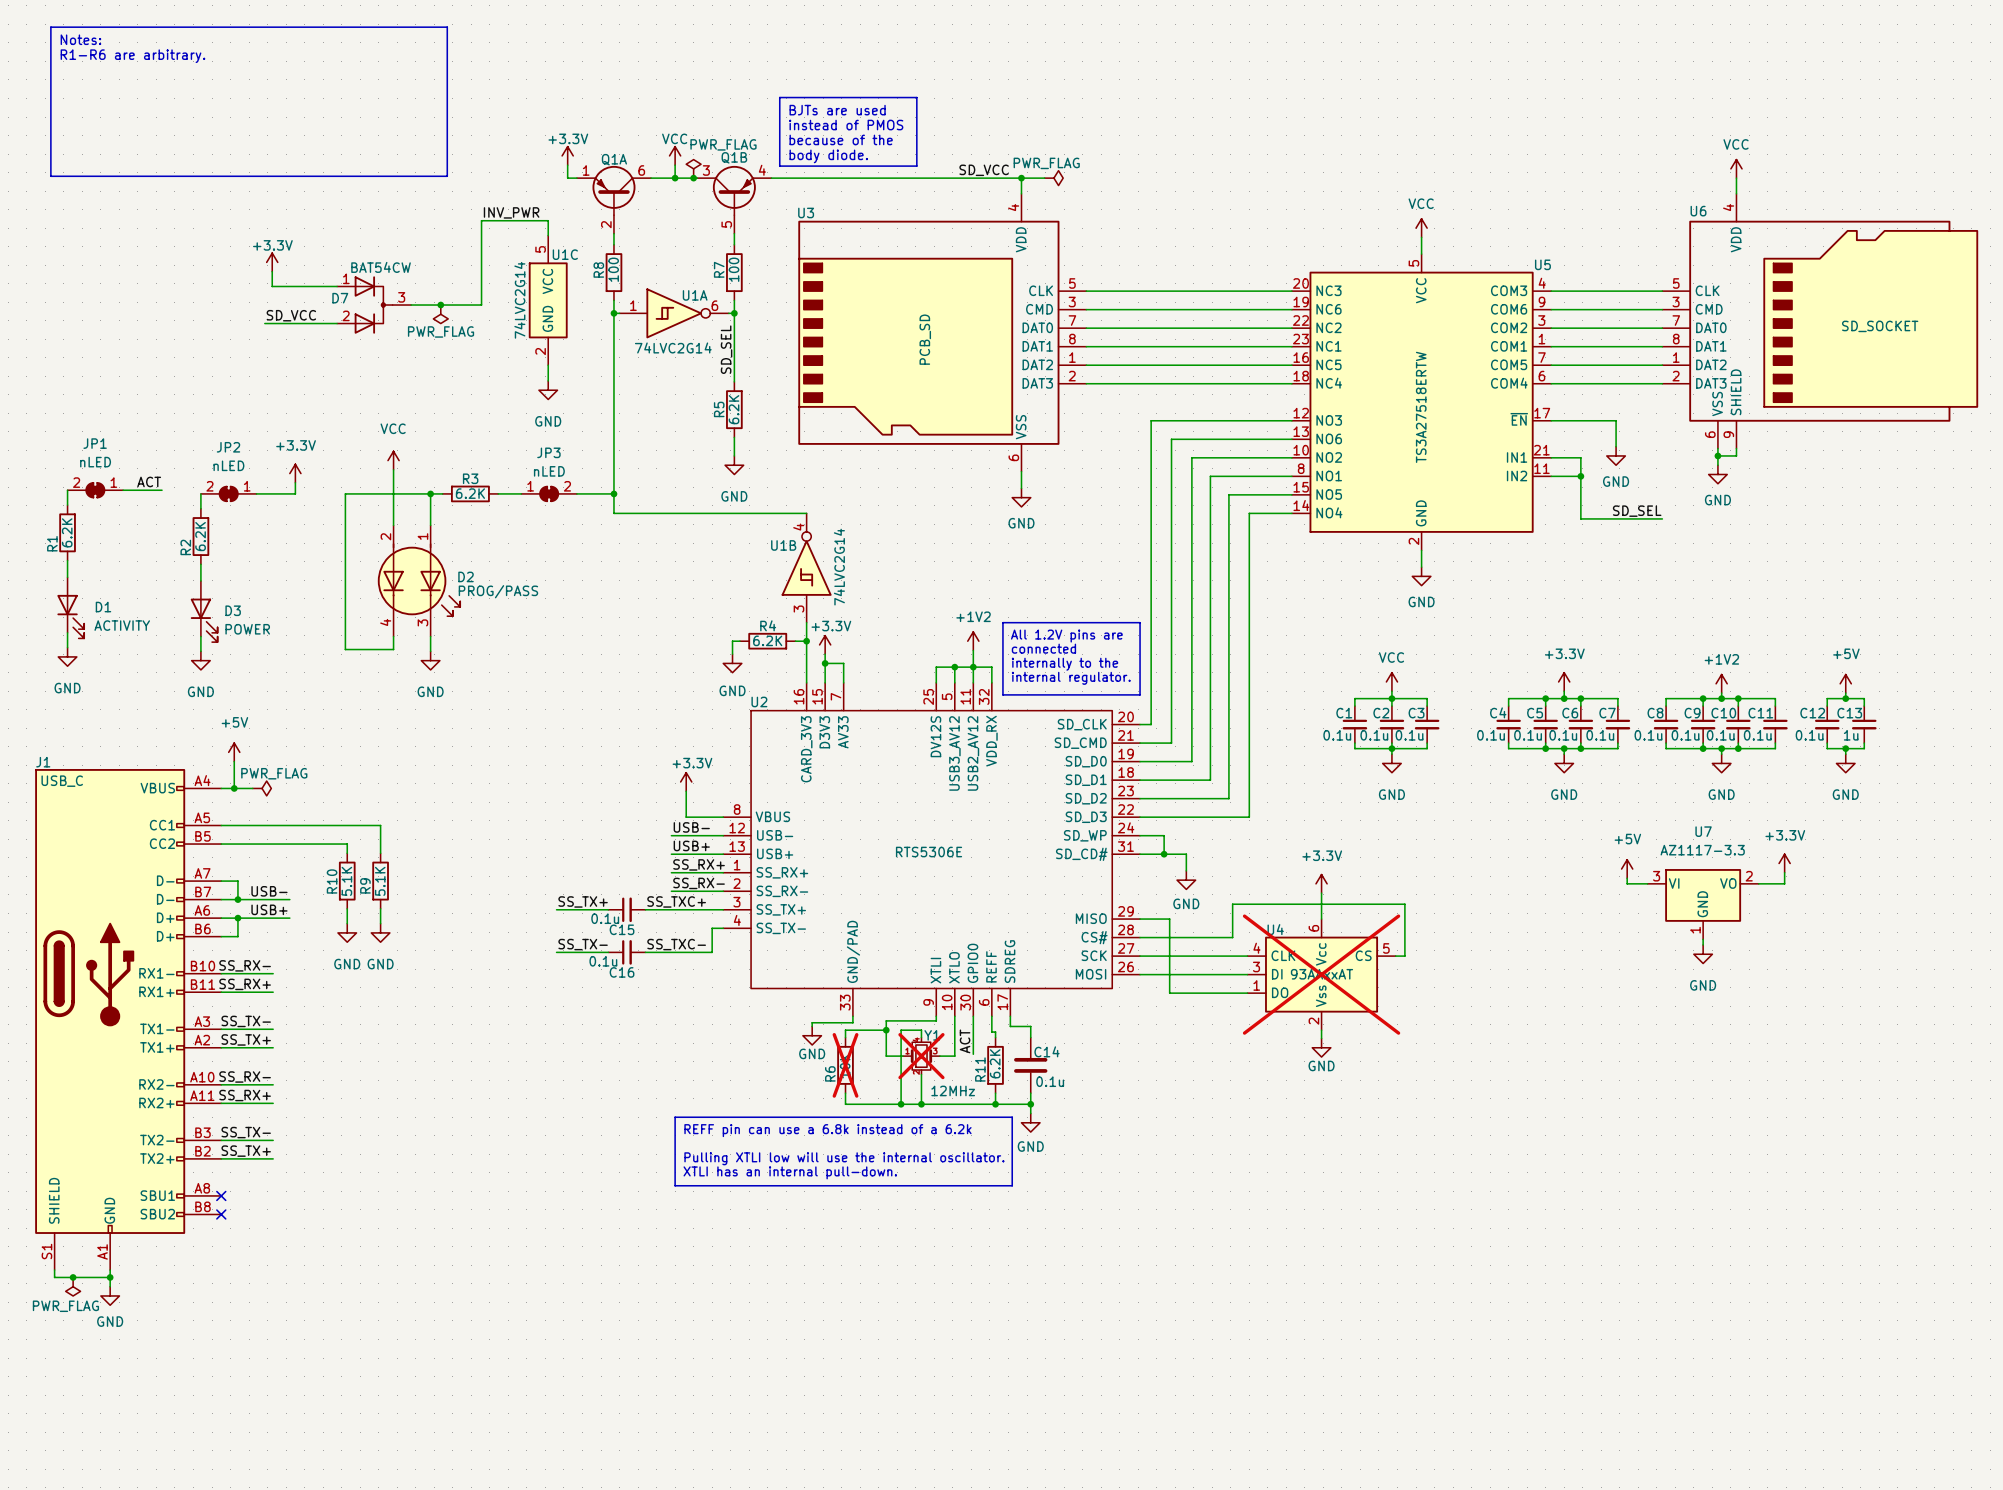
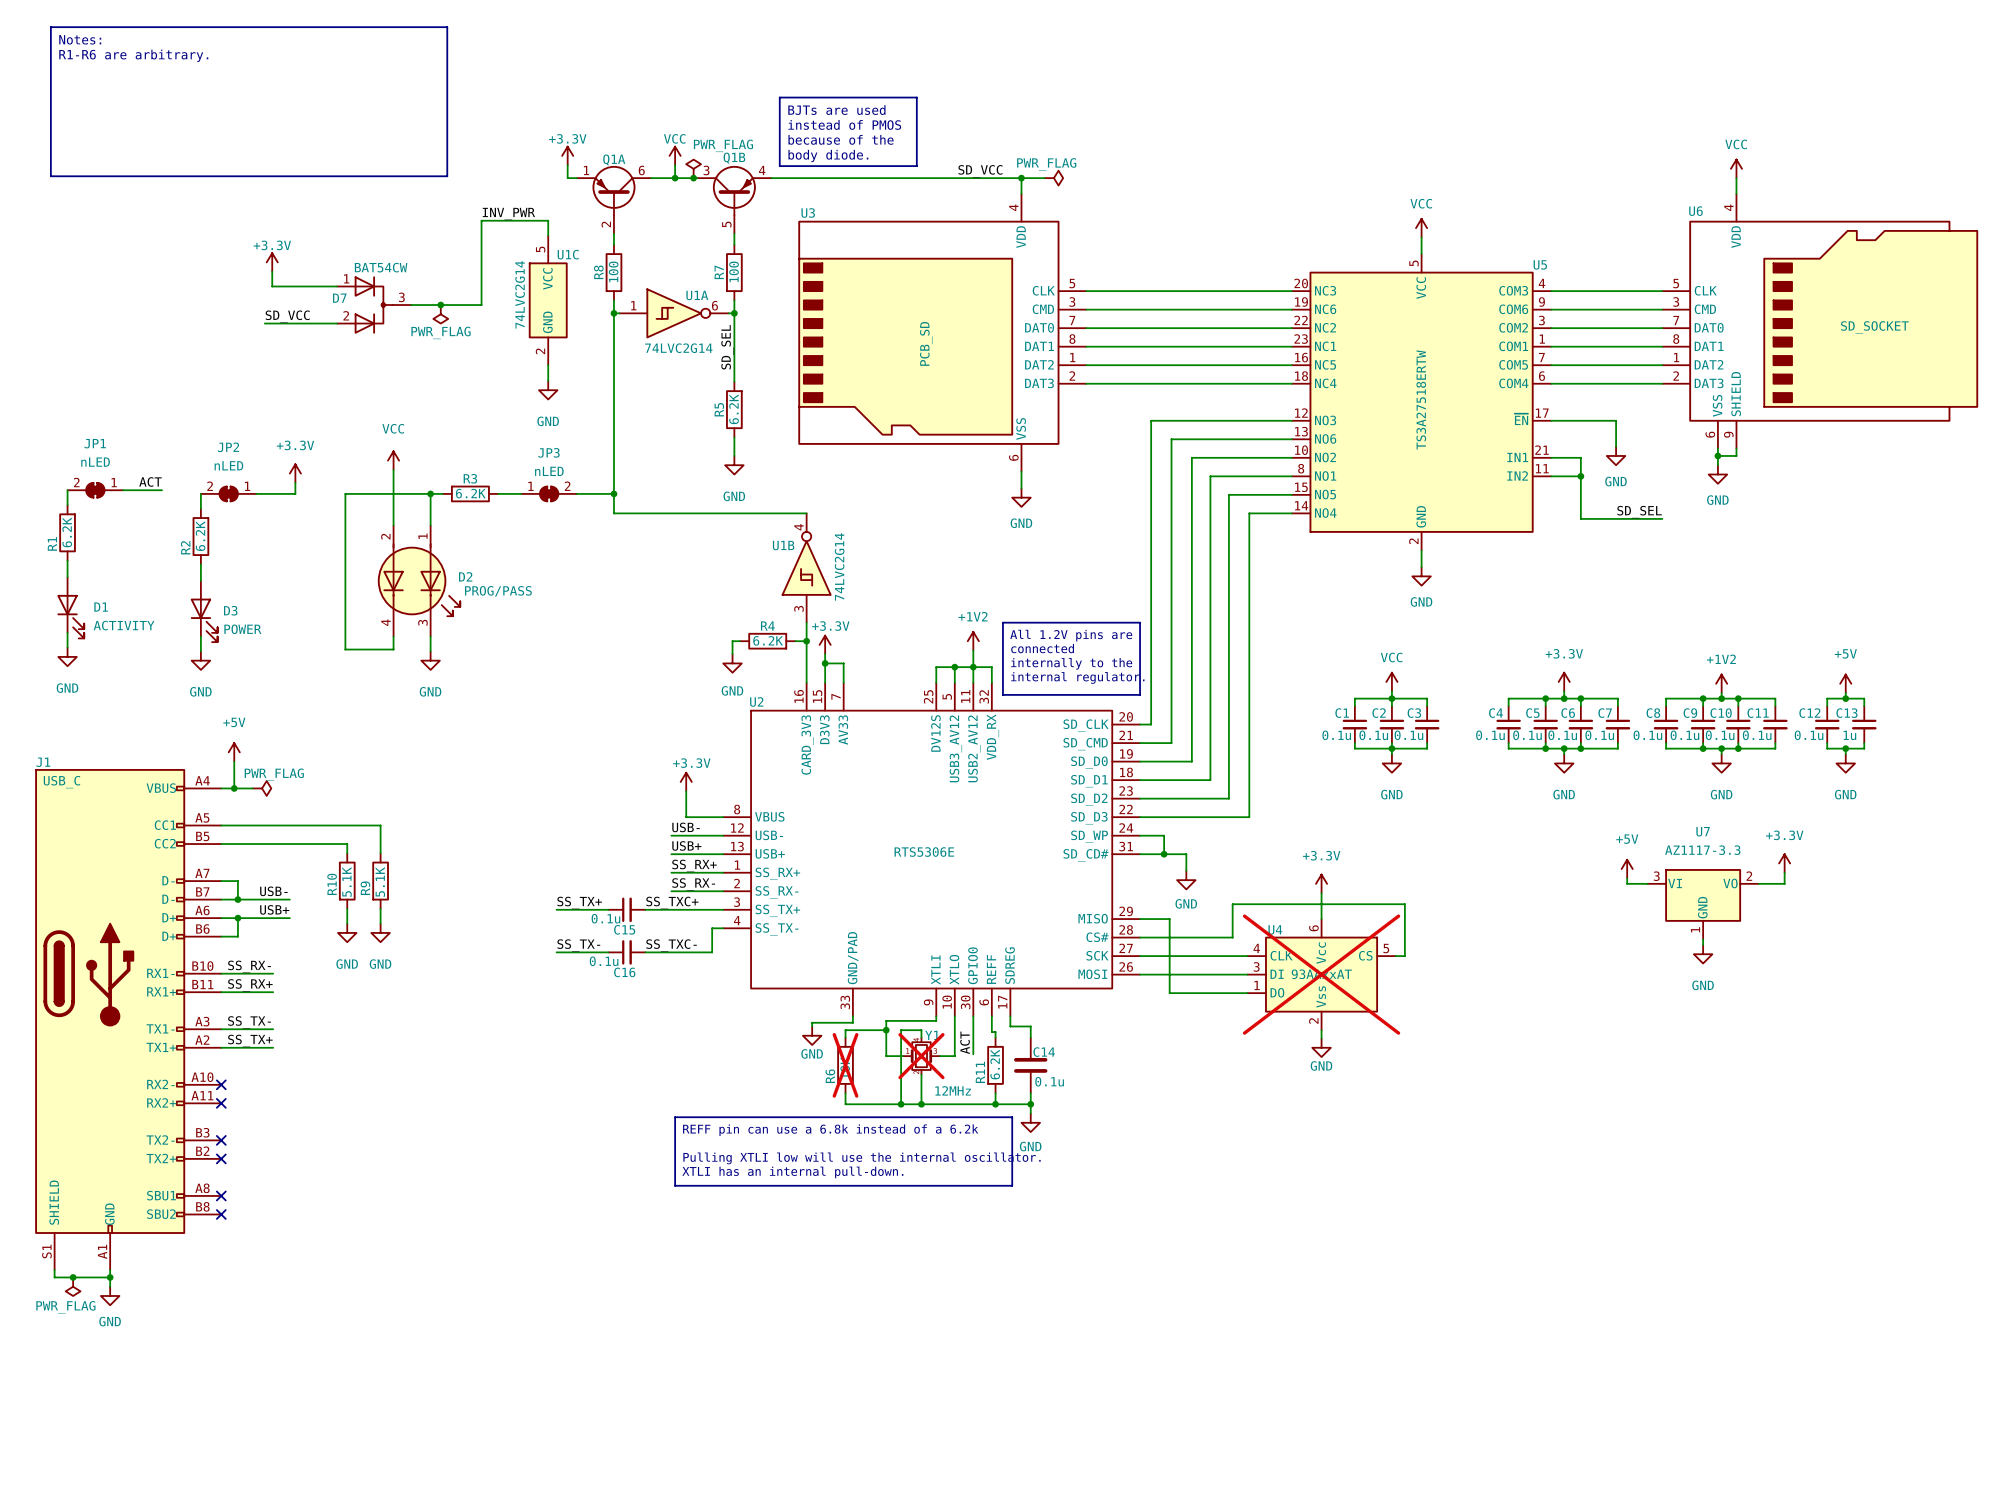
label: SS_RX- (245, 1077) -> none
wire: (221, 1084) (273, 1084) -> none
no-connect mark: none -> (221, 1084)
label: SS_RX+ (245, 1095) -> none
wire: (221, 1103) (273, 1103) -> none
no-connect mark: none -> (221, 1103)
label: SS_TX- (246, 1132) -> none
wire: (221, 1140) (273, 1140) -> none
no-connect mark: none -> (221, 1140)
label: SS_TX+ (246, 1151) -> none
wire: (221, 1158) (273, 1158) -> none
no-connect mark: none -> (221, 1158)

